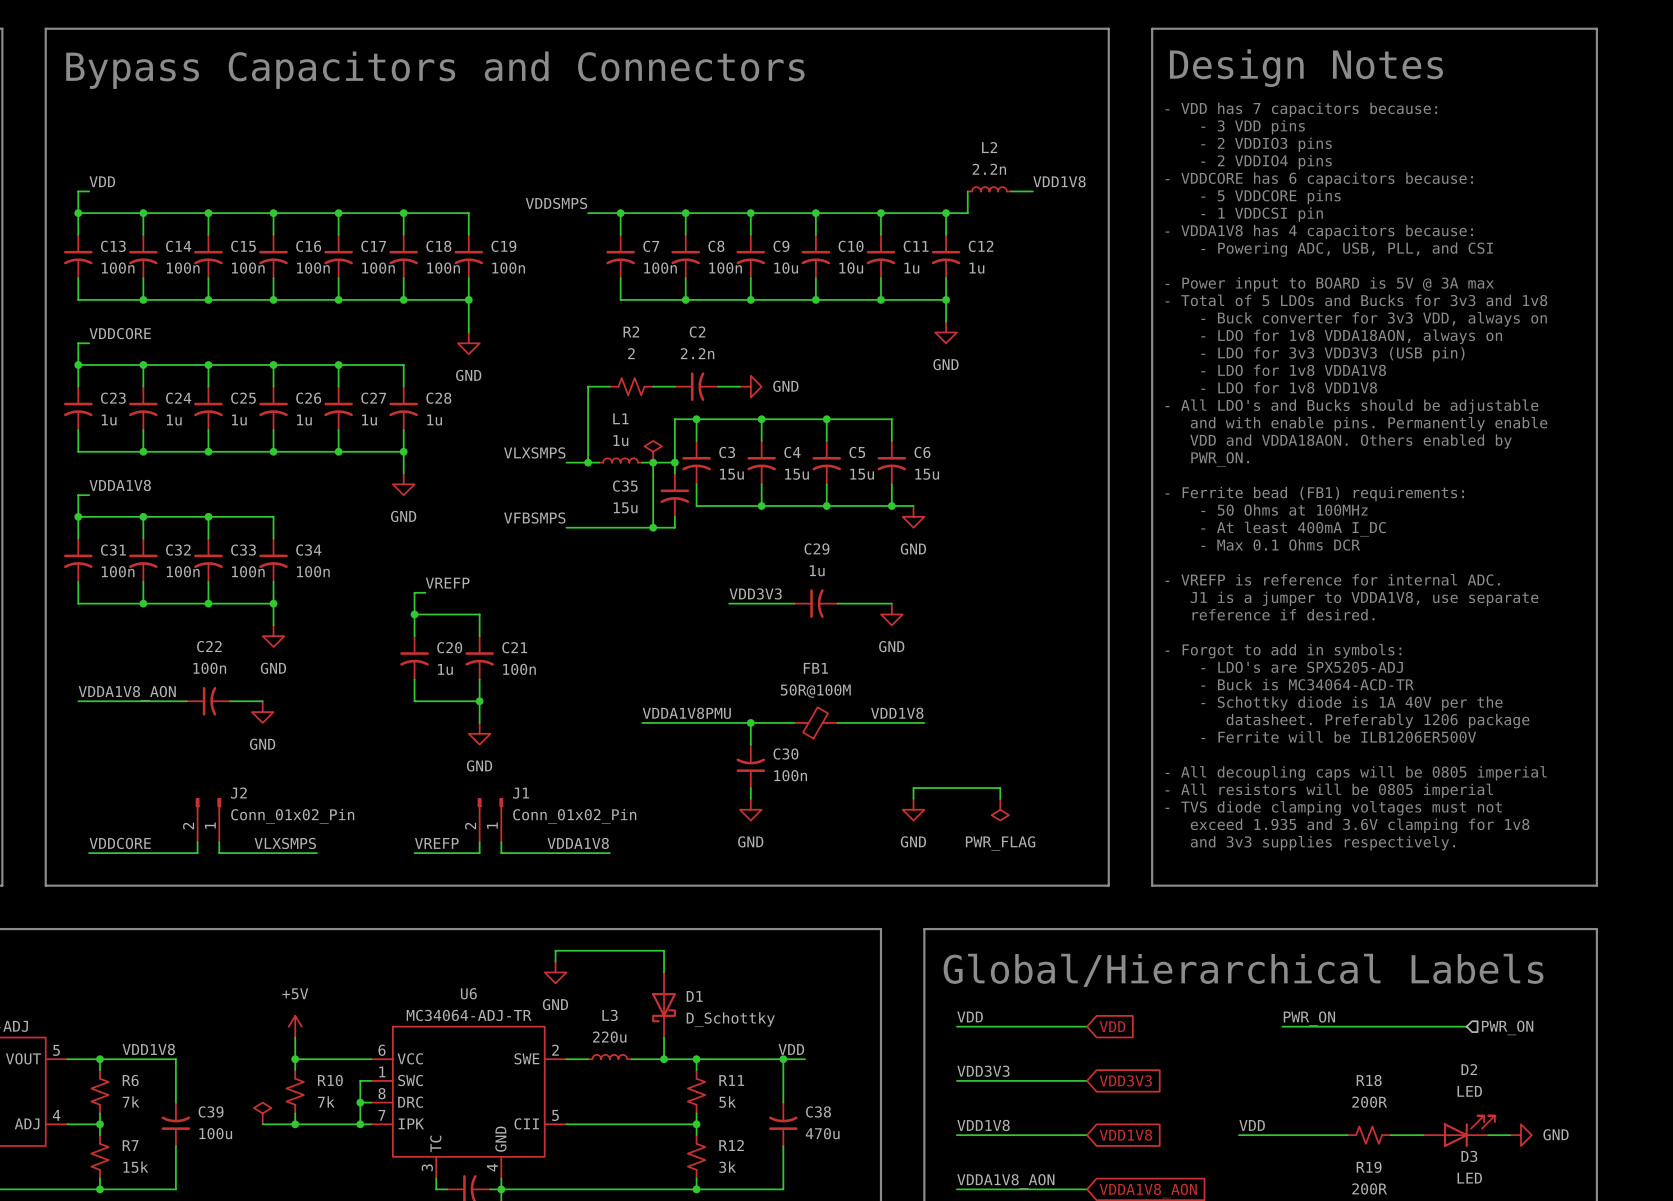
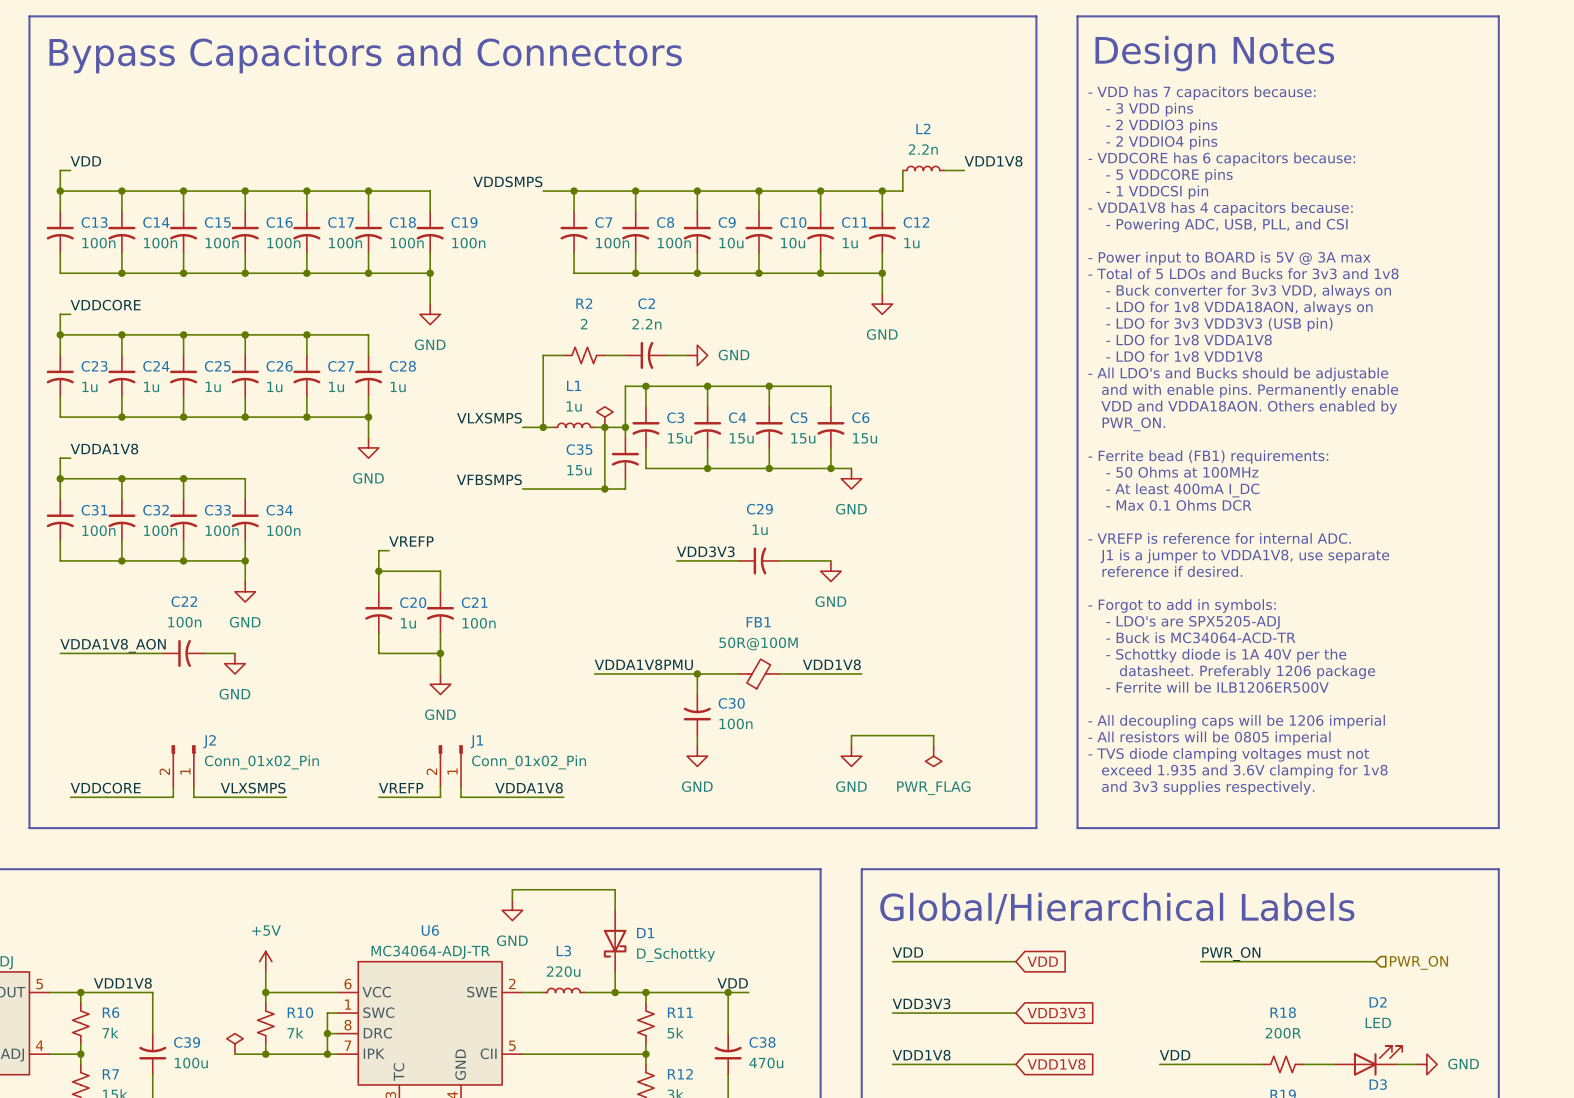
text: - All decoupling caps will be 0805 imperial (1356, 773) -> - All decoupling caps will be 1206 imperial (1236, 721)

